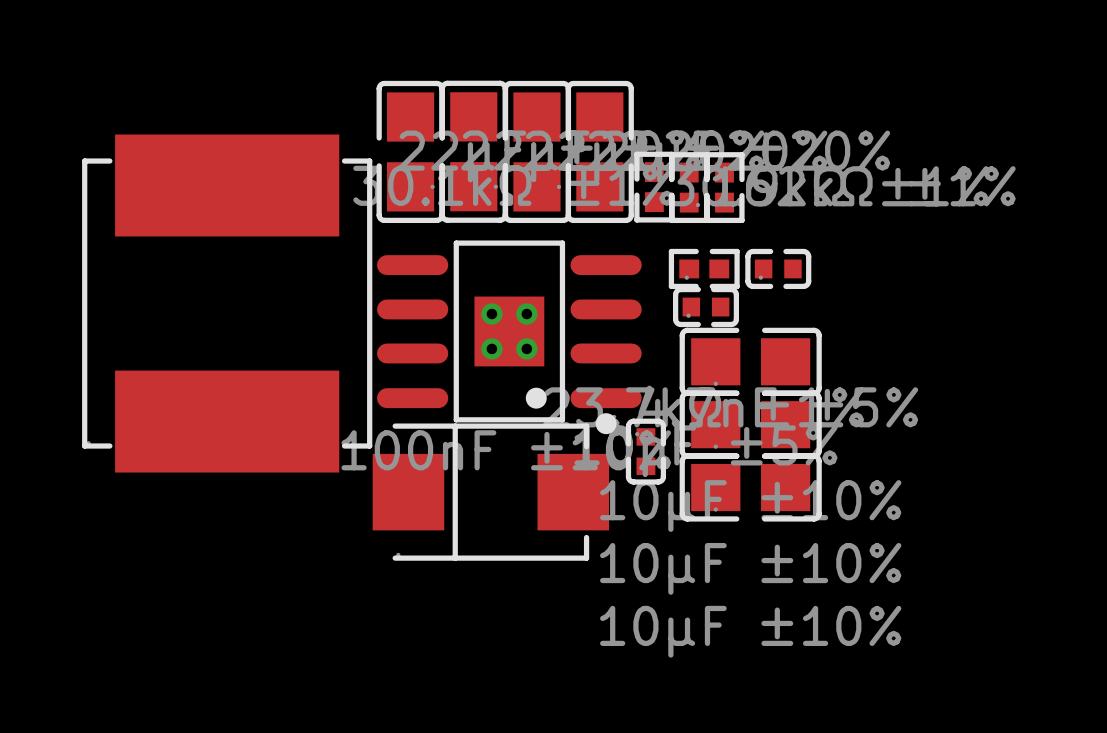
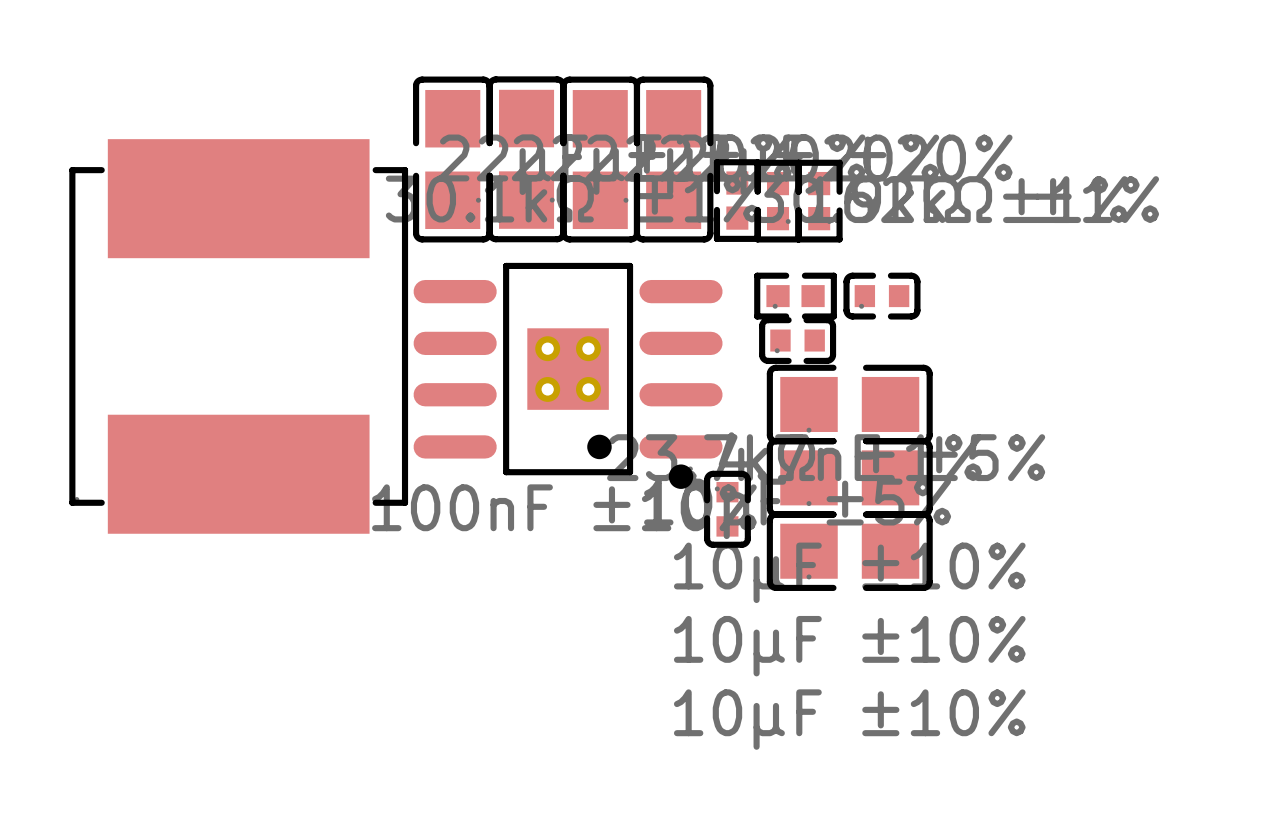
part: (490, 492) -> none

